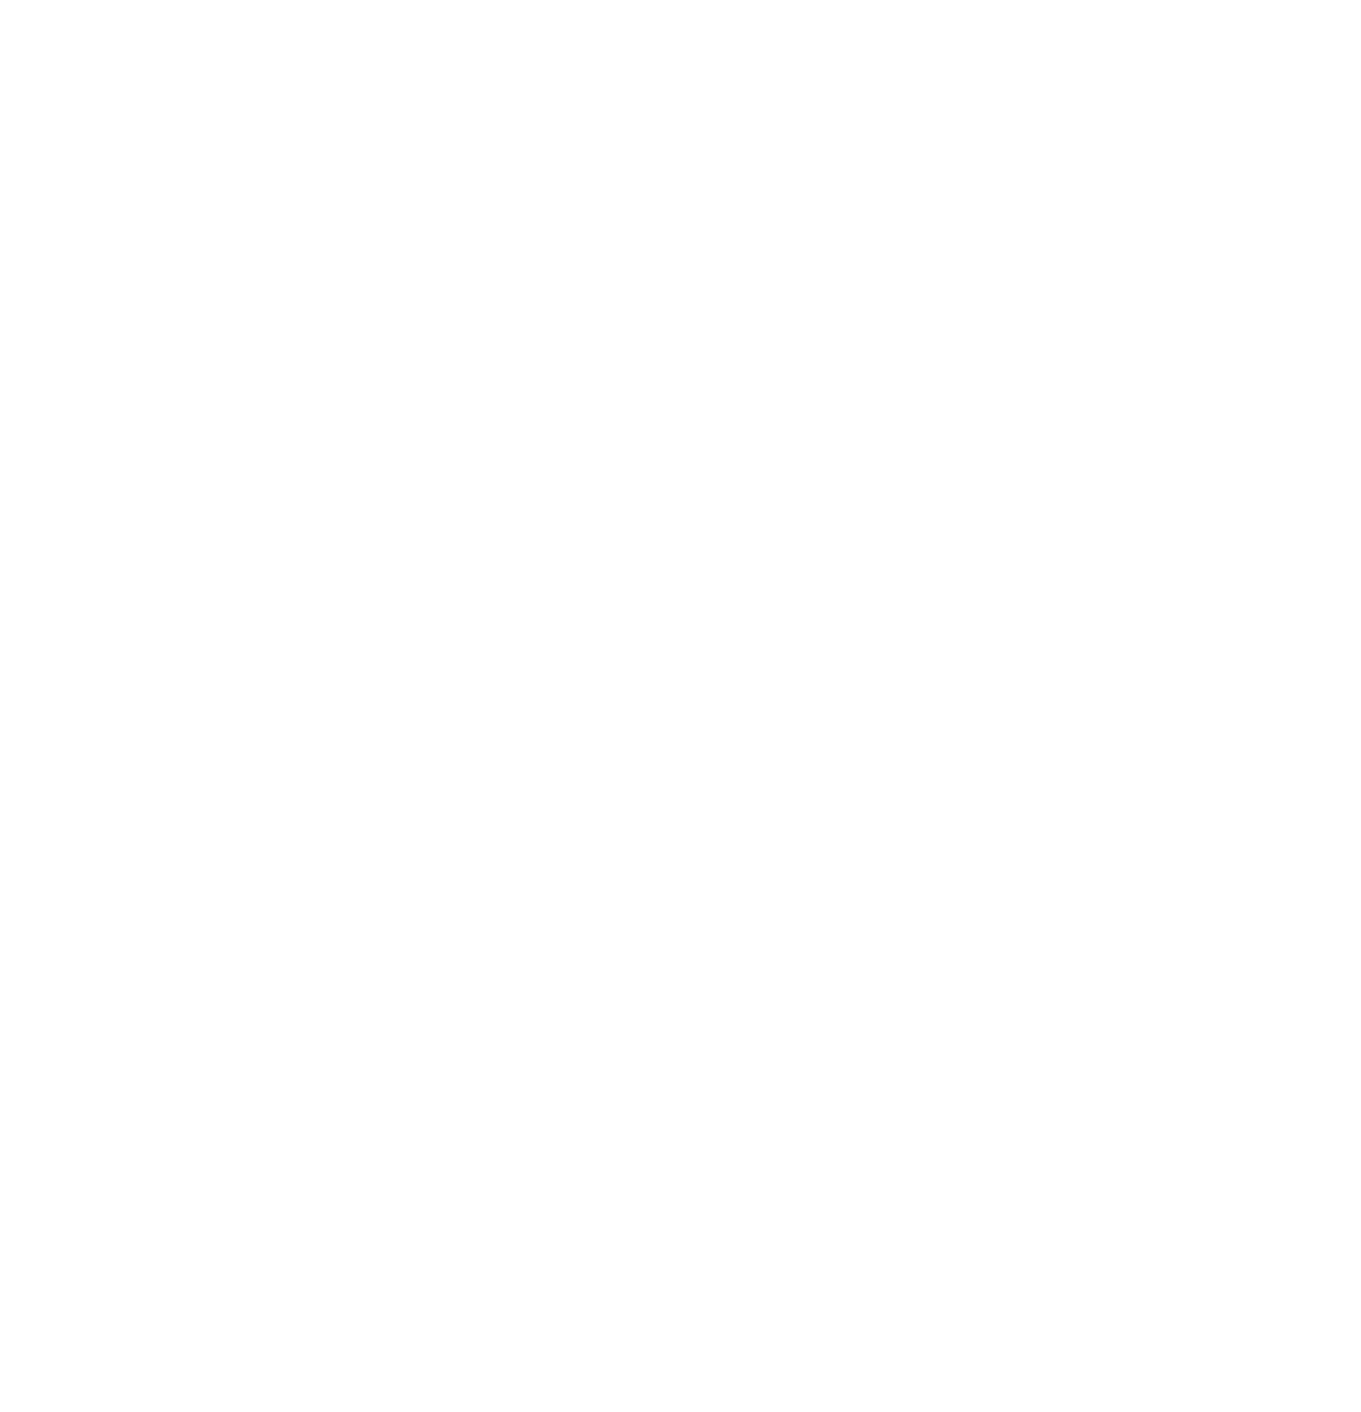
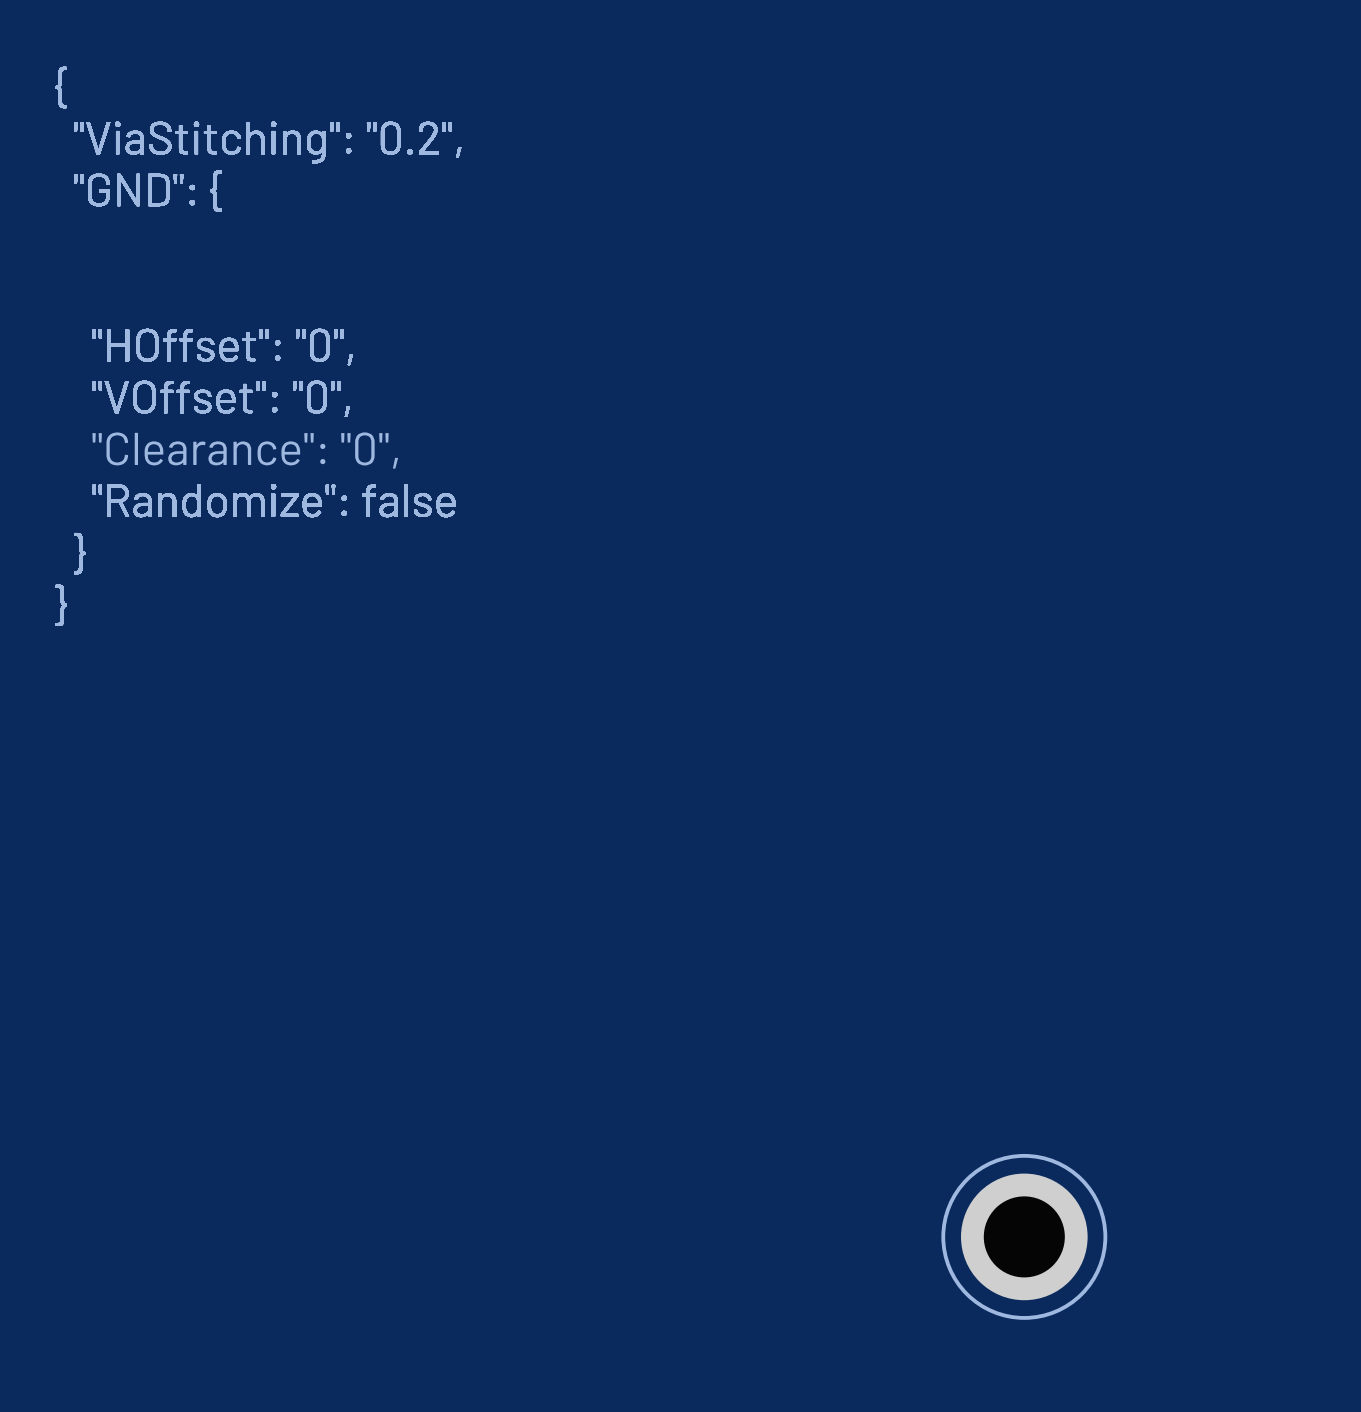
text: none -> { (61, 87)
text: none -> "ViaStitching": "0.2", (267, 142)
text: none -> "GND": { (147, 191)
text: none -> "HOffset": "0", (222, 346)
text: none -> "VOffset": "0", (221, 398)
text: none -> "Clearance": "0", (245, 450)
text: none -> "Randomize": false (273, 500)
text: none -> } (79, 553)
text: none -> } (61, 605)
part: none -> (1024, 1236)

